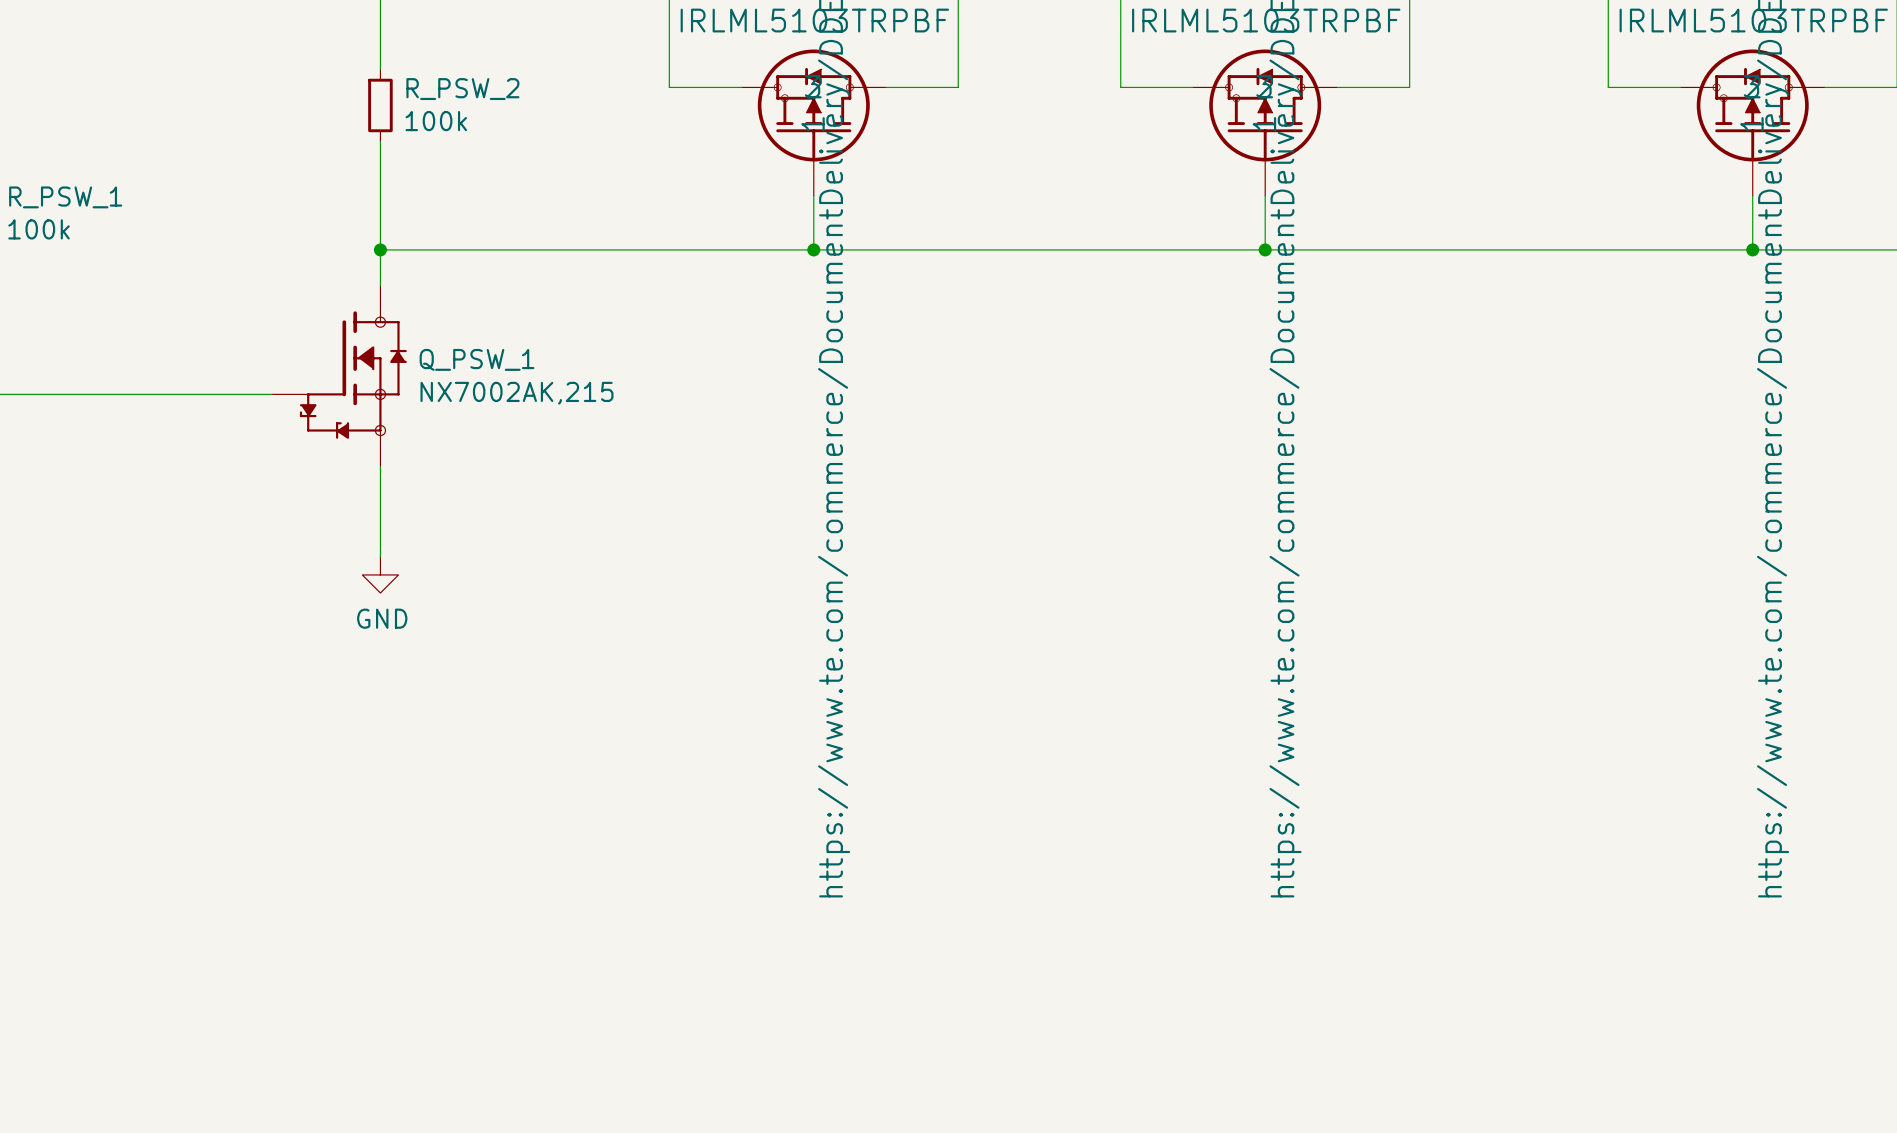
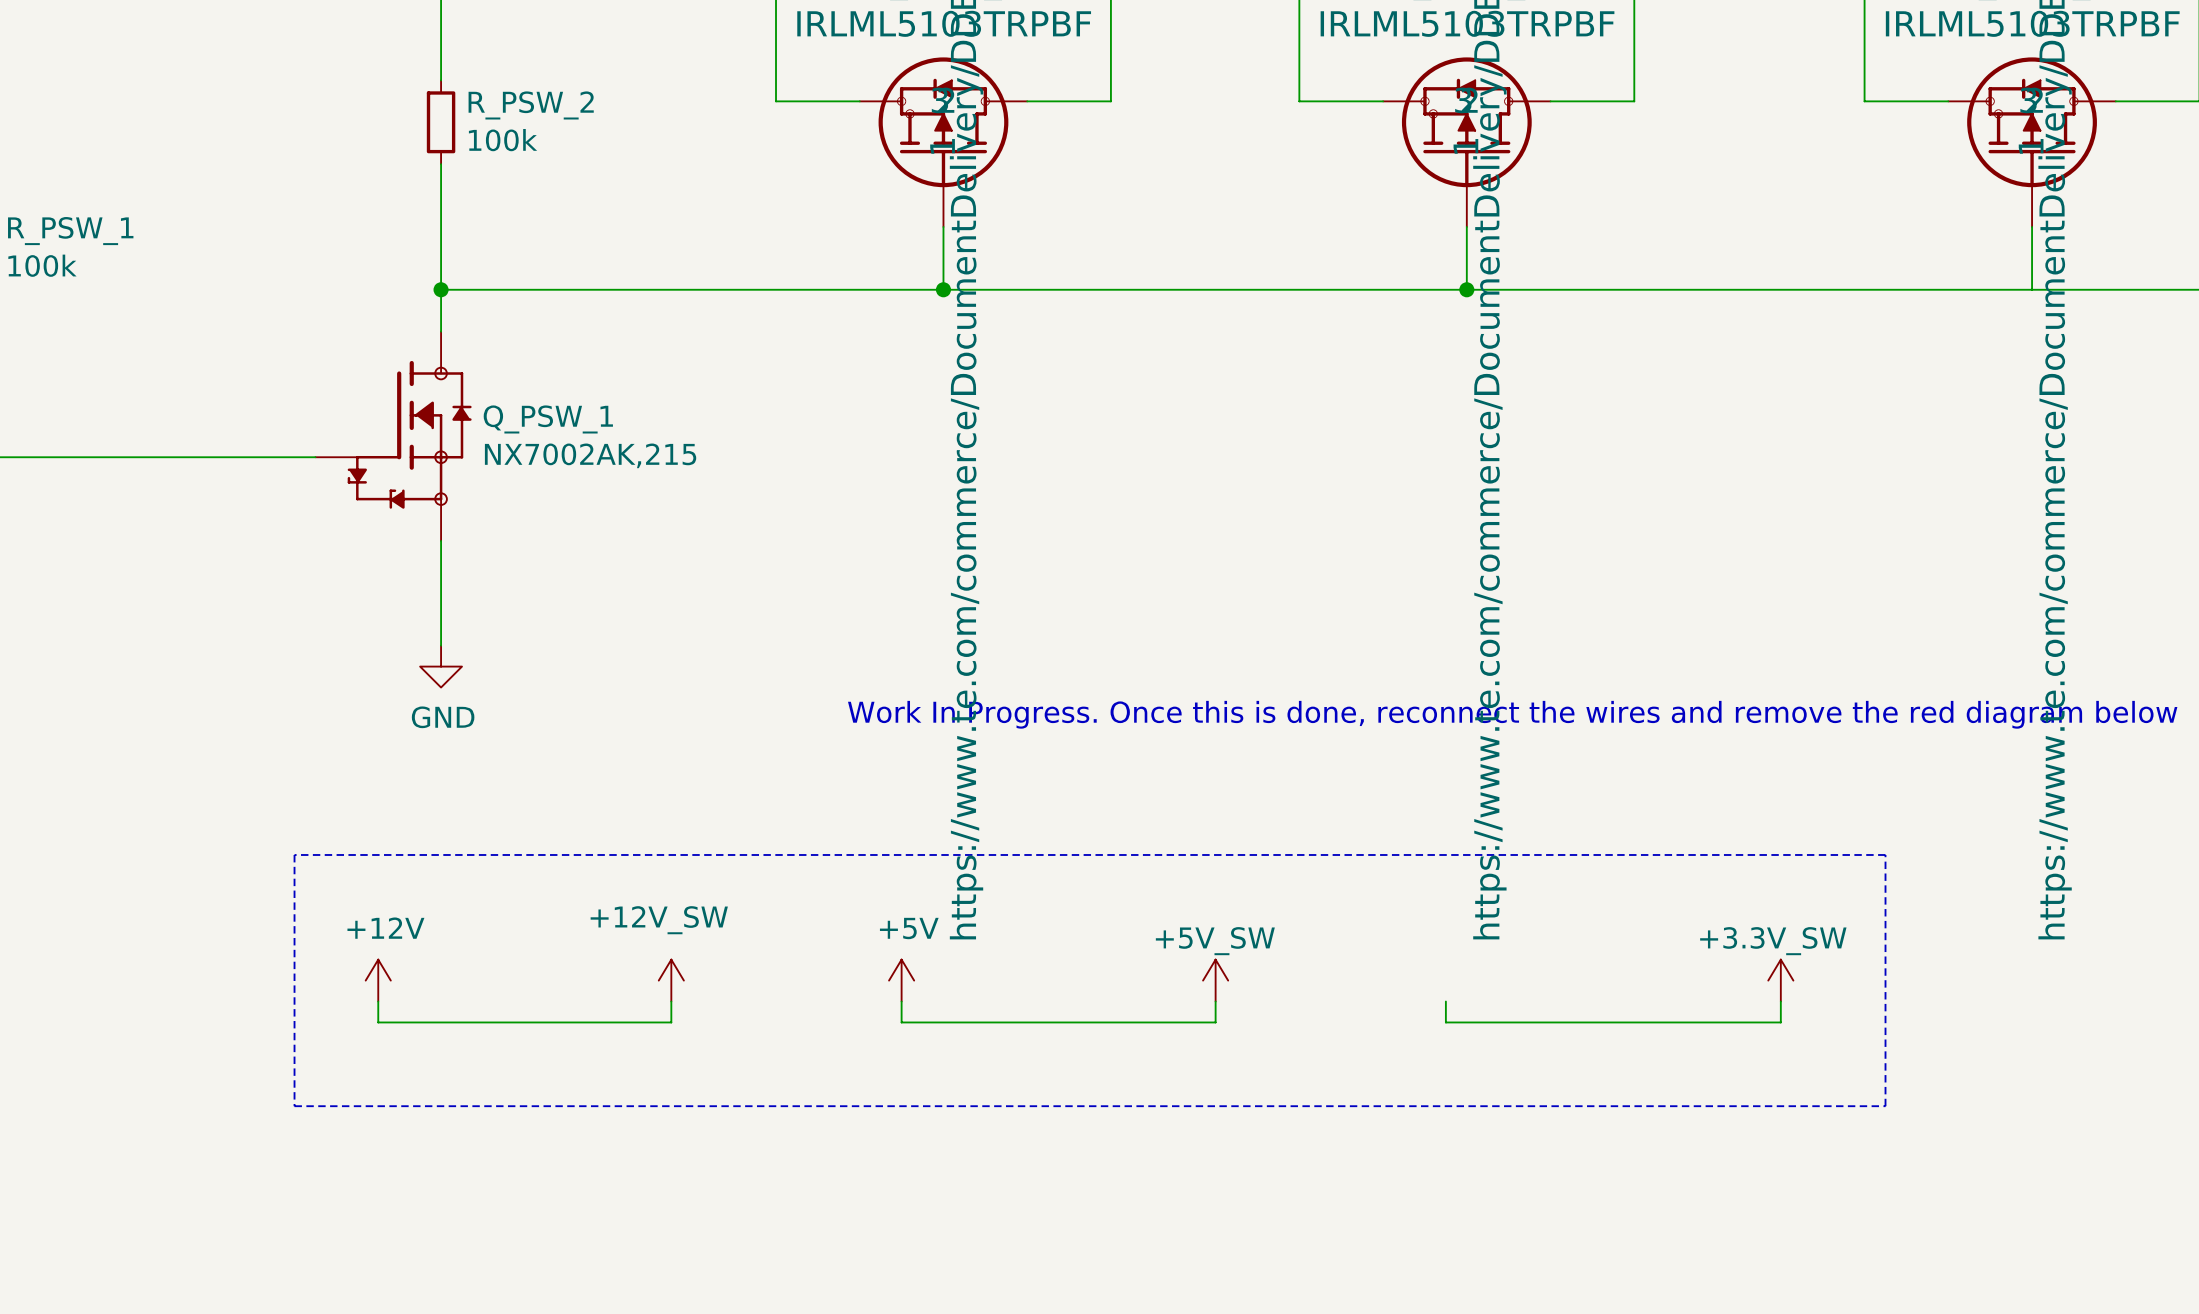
junction: (1752, 249) -> none
text: none -> Work In Progress. Once this is done, reconnect the wires and remove the red diagram below (1512, 714)
line: none -> (294, 854) (1885, 854) (1885, 1106) (294, 1106) (294, 854)
power symbol: none -> +12V (378, 980)
power symbol: none -> +12V_SW (671, 980)
power symbol: none -> +5V (901, 980)
power symbol: none -> +5V_SW (1215, 980)
power symbol: none -> +3.3V_SW (1780, 980)
wire: none -> (378, 1001) (378, 1022) (671, 1022) (671, 1001)
wire: none -> (901, 1001) (901, 1022) (1215, 1022) (1215, 1001)
wire: none -> (1445, 1001) (1445, 1022) (1780, 1022) (1780, 1001)

